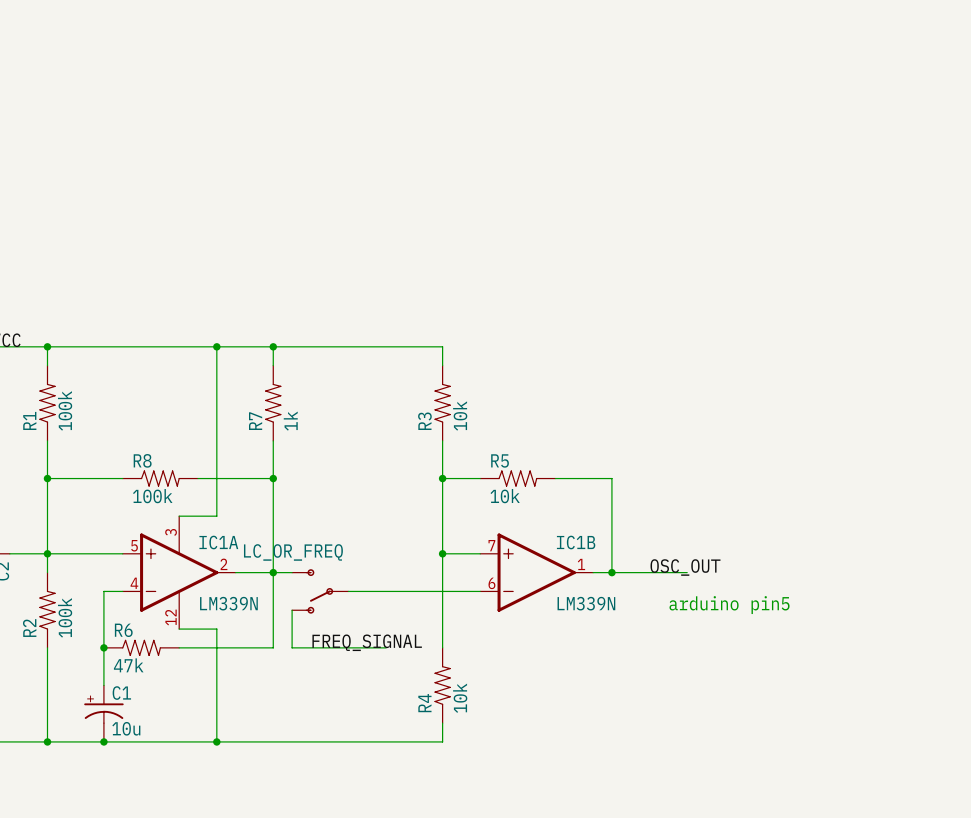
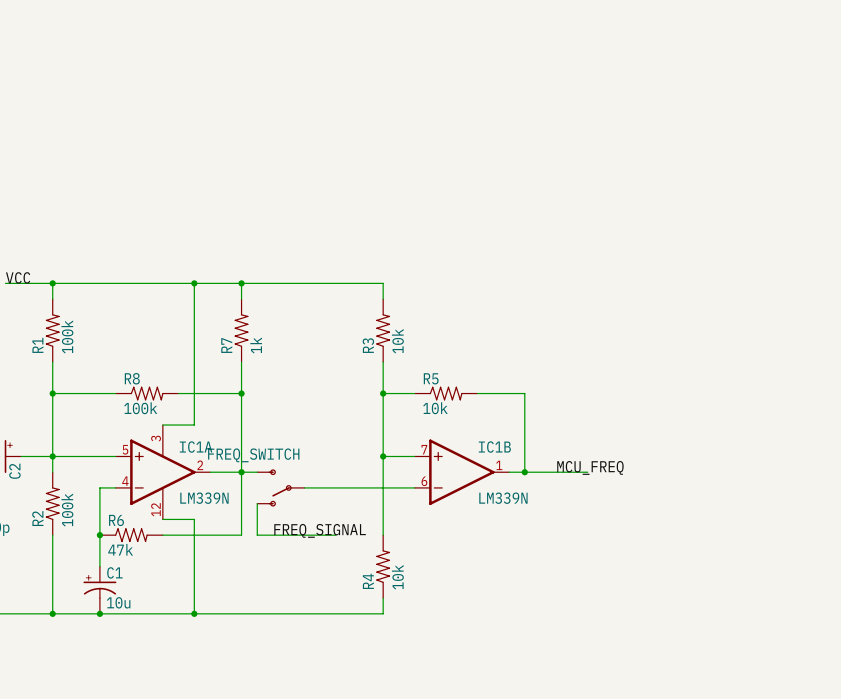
LC_OR_FREQ name: LC_OR_FREQ (293, 552) -> FREQ_SWITCH (253, 455)
label: OSC_OUT (685, 567) -> MCU_FREQ (590, 467)
text: arduino pin5 (729, 605) -> none

